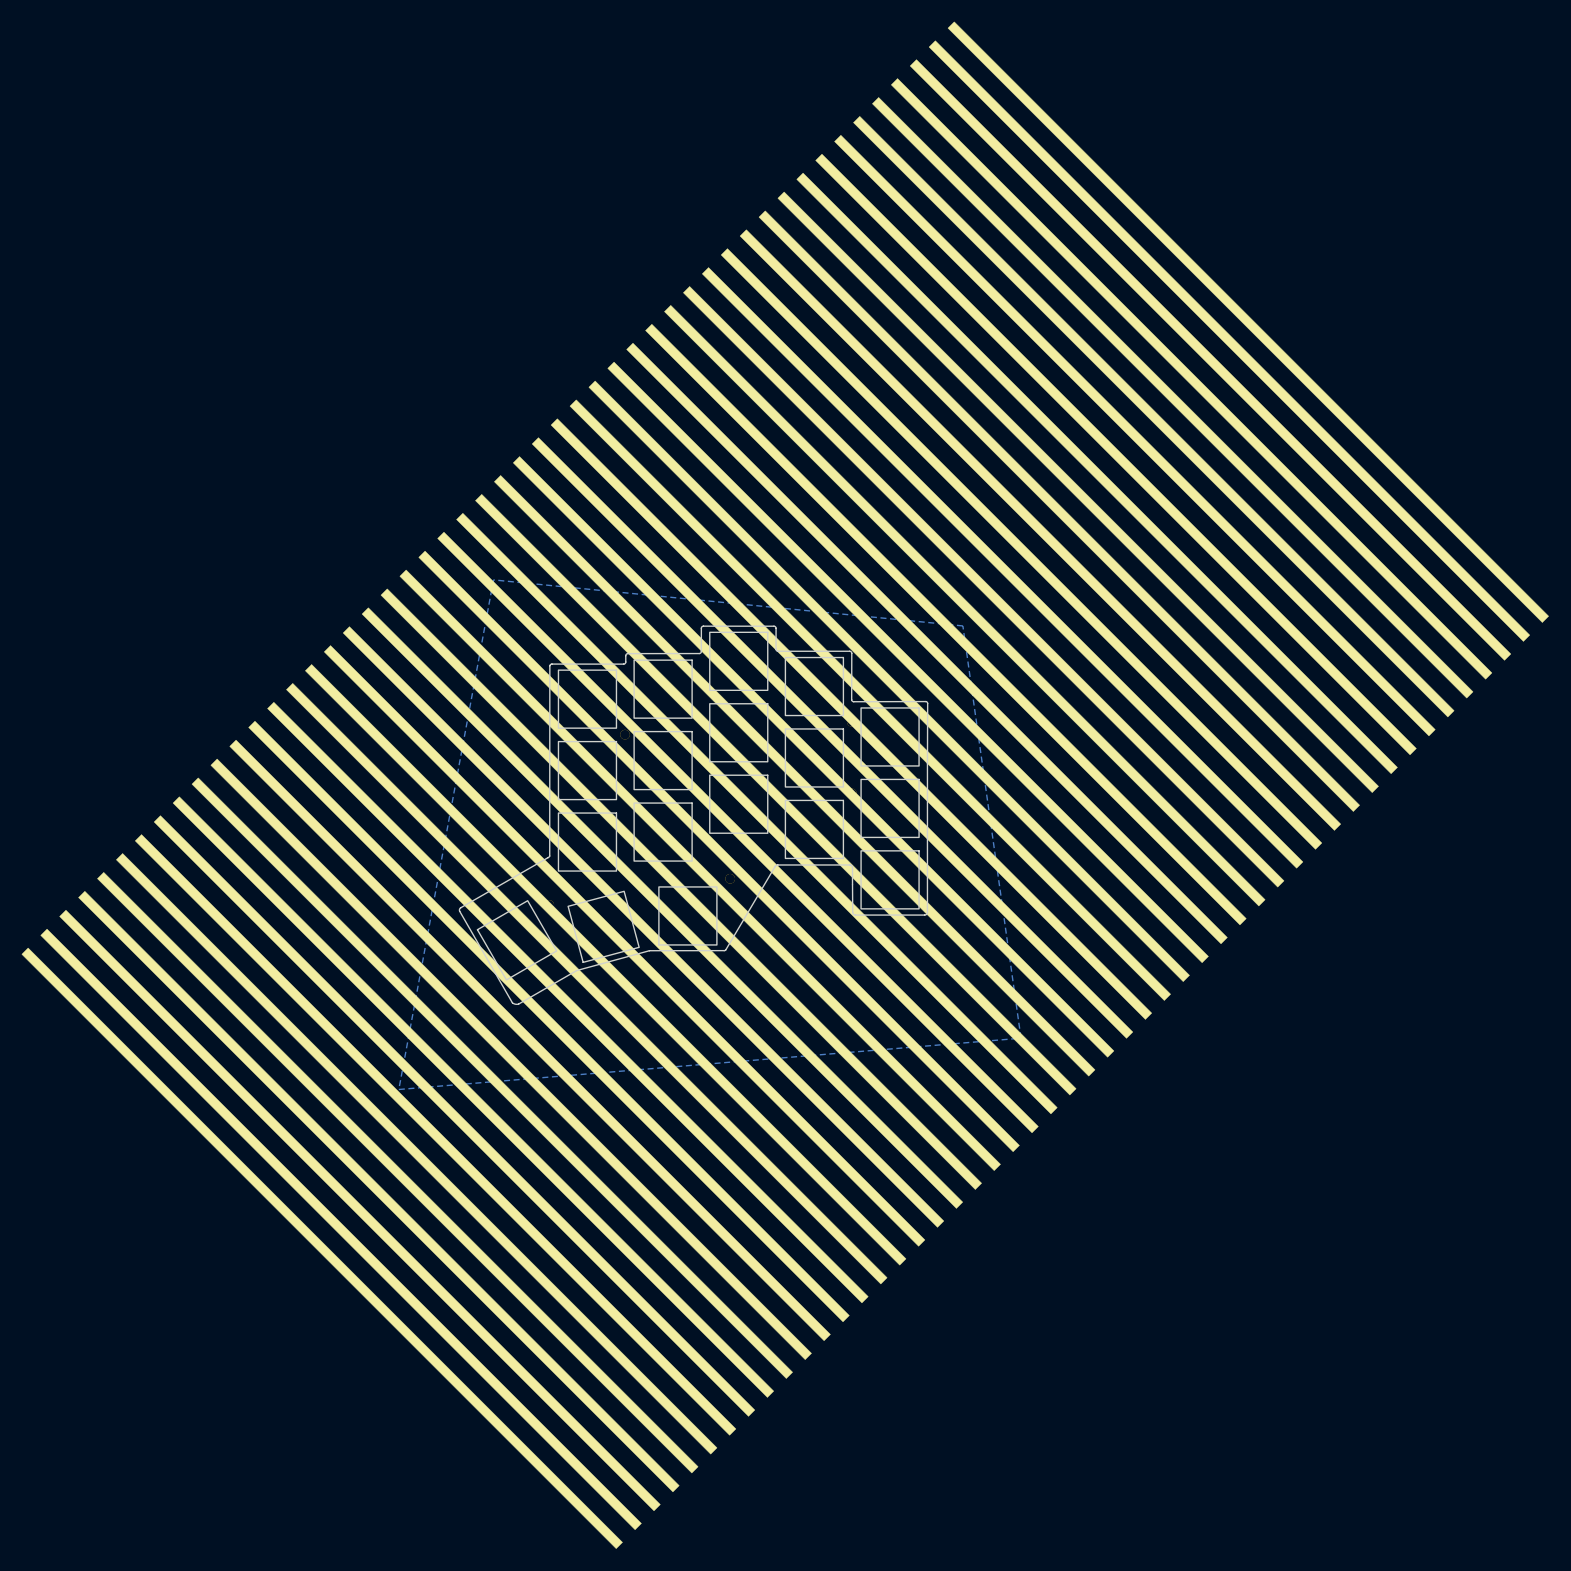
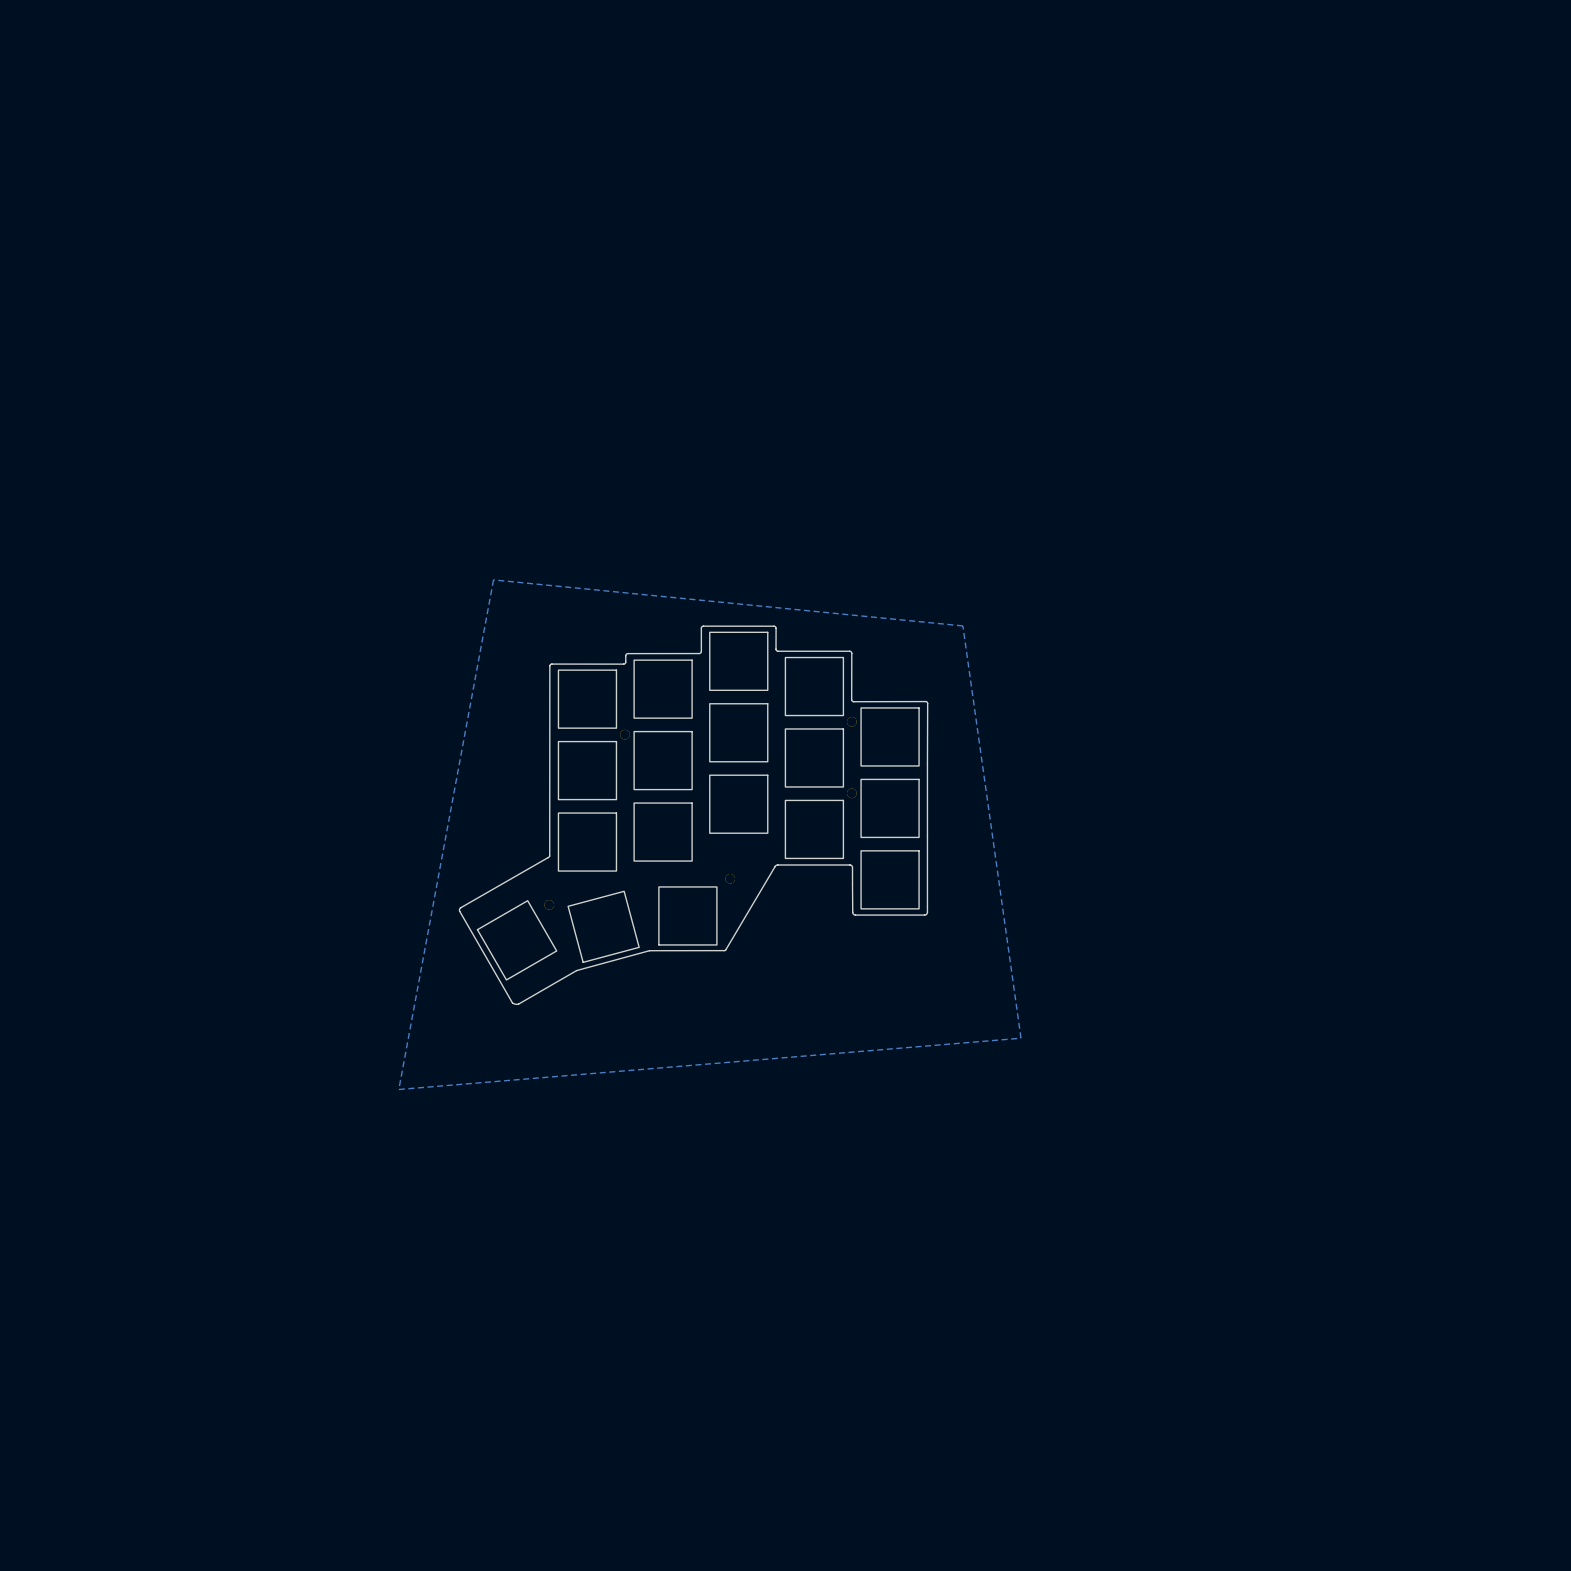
drawing: [21, 21, 1549, 1549] -> none

